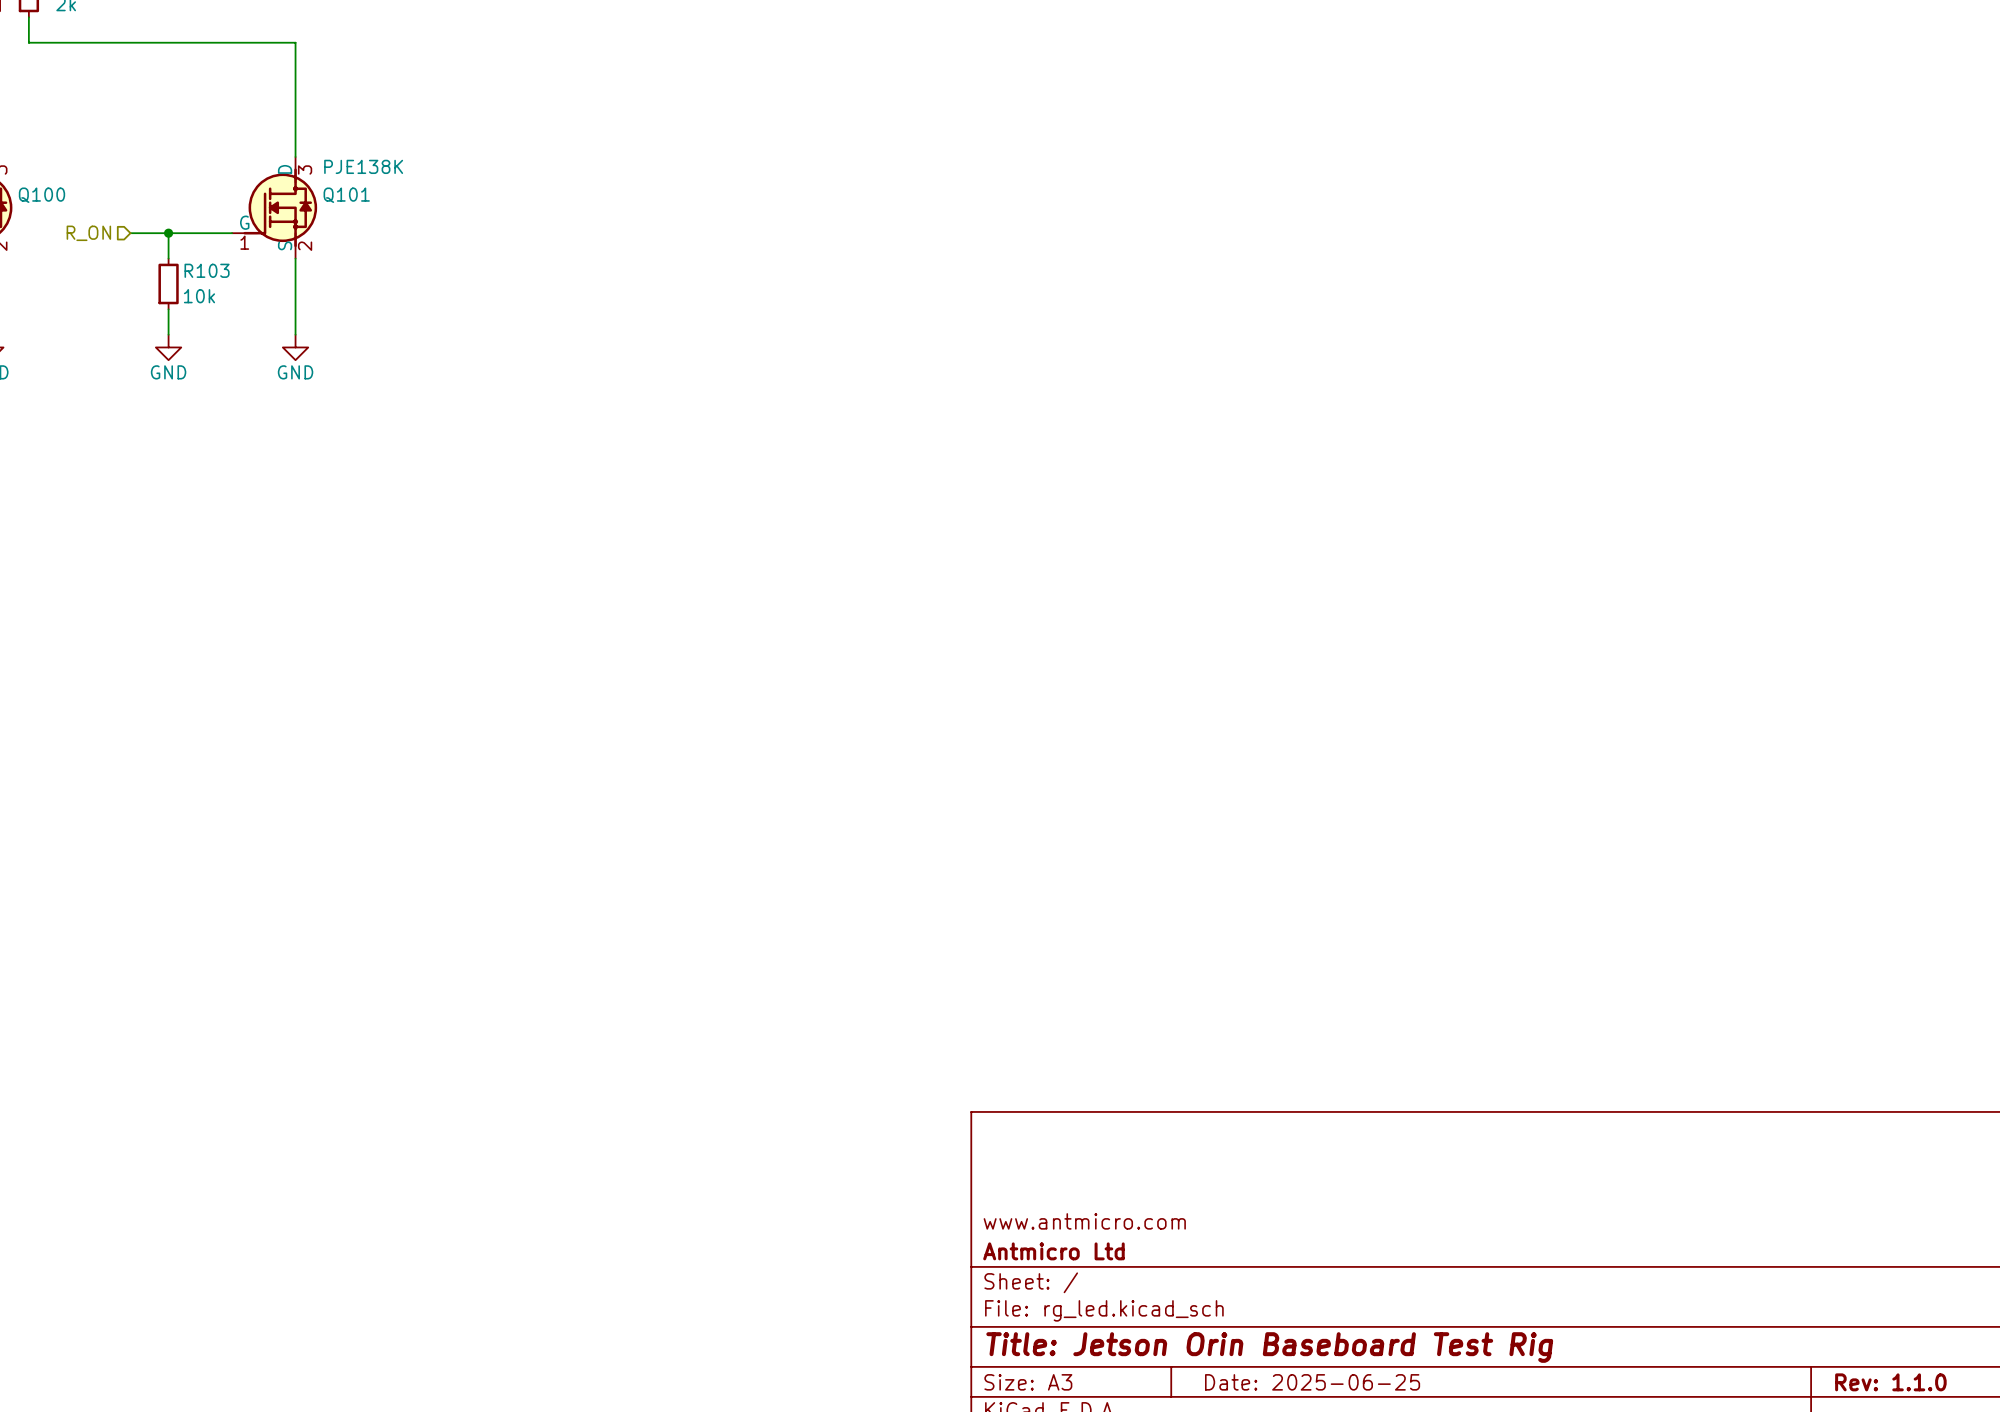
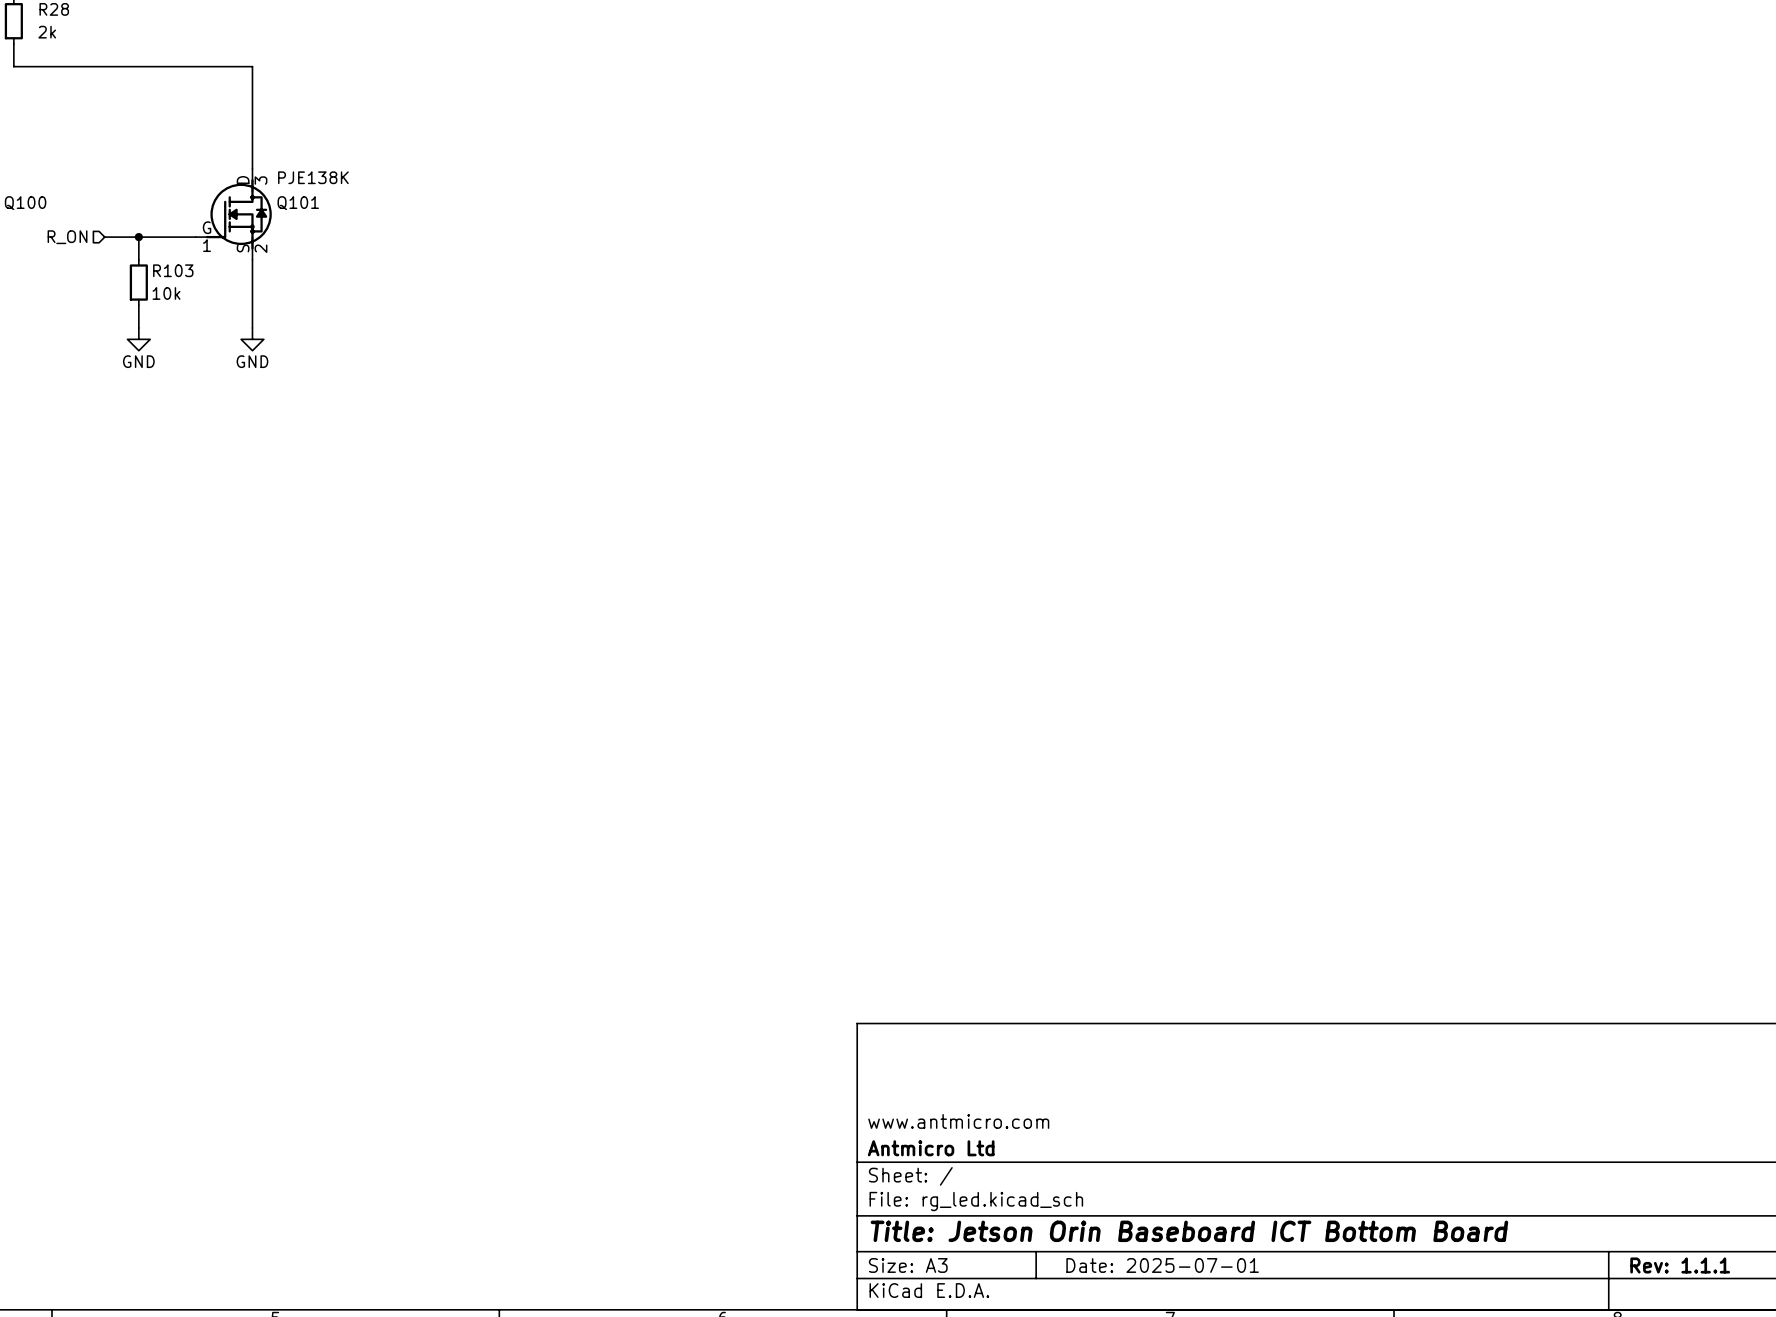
title block: Title: Jetson Orin Baseboard Test Rig (1269, 1347) -> Title: Jetson Orin Baseboard ICT Bottom Board (1189, 1231)
title block: Date: 2025-06-25 (1312, 1382) -> Date: 2025-07-01 (1162, 1265)
title block: Rev: 1.1.0 (1890, 1382) -> Rev: 1.1.1 (1680, 1265)

